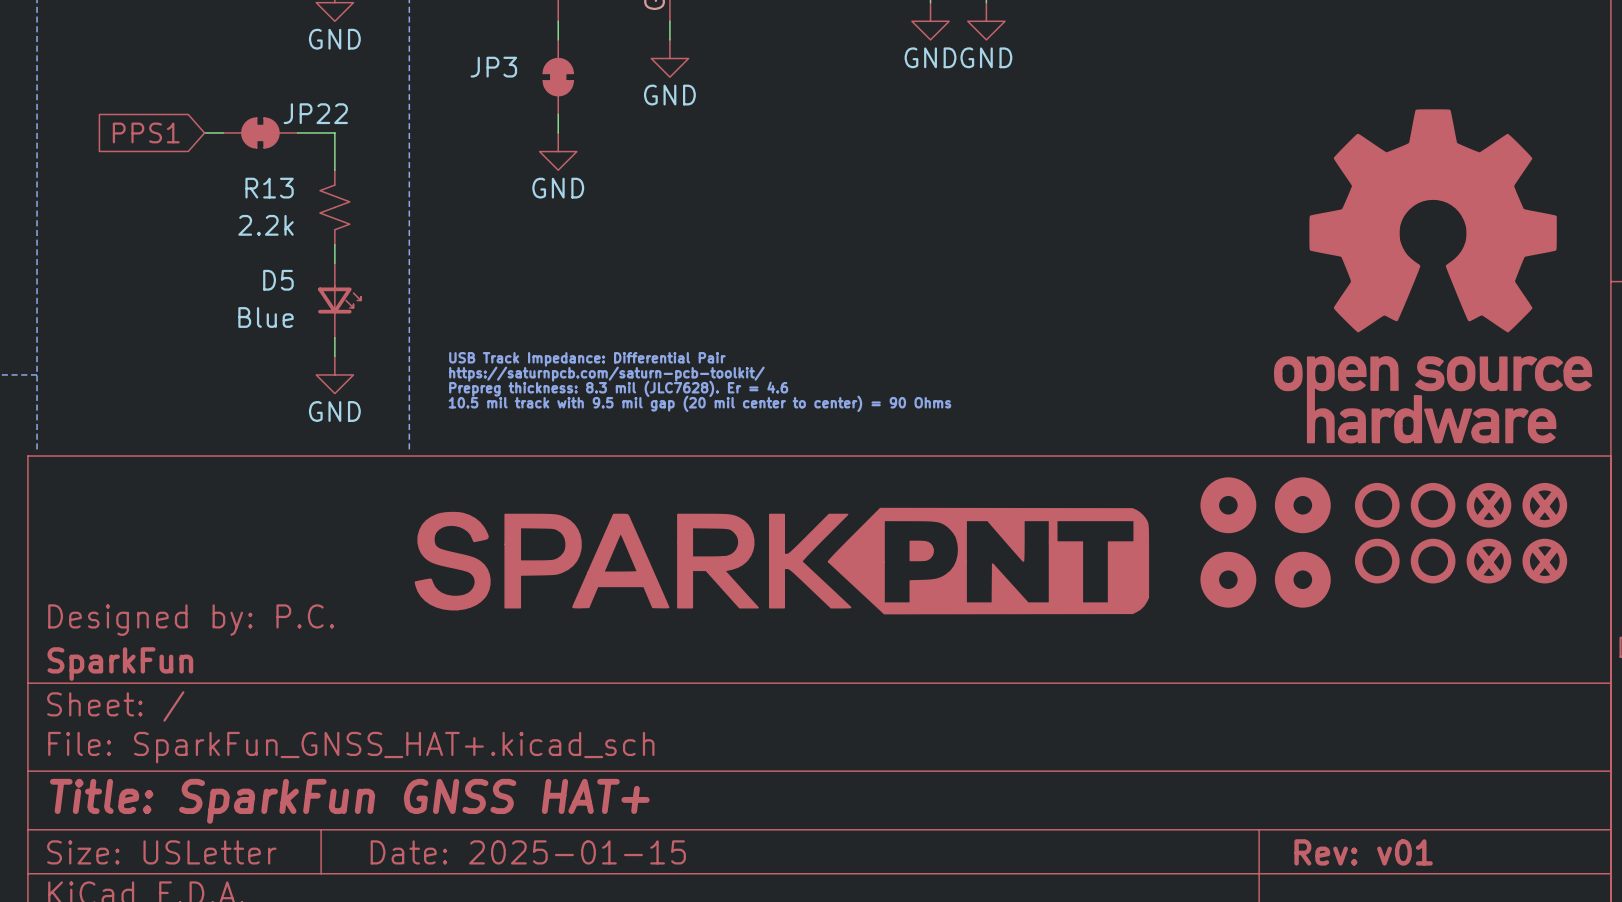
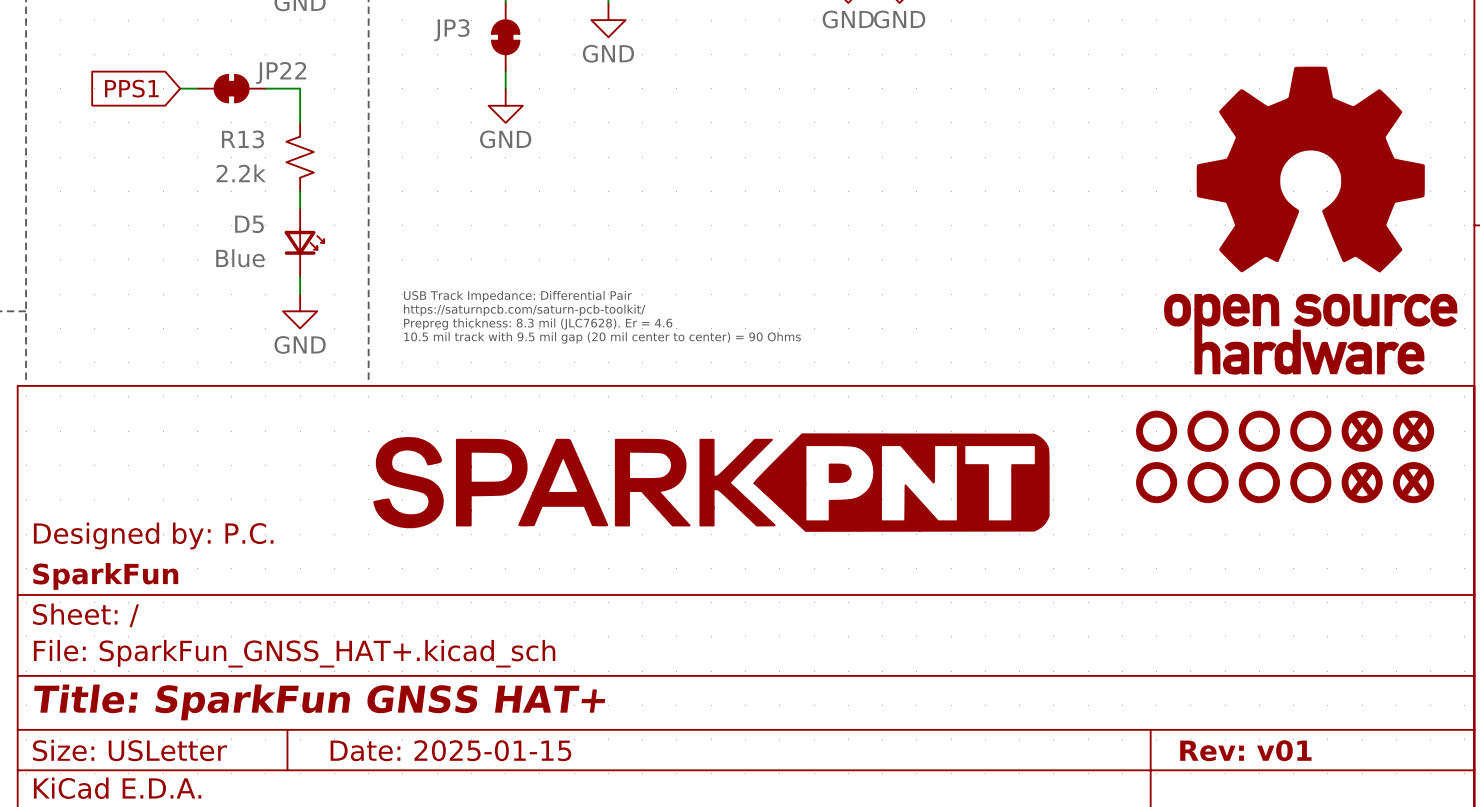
part: (1228, 505) -> none
part: none -> (1156, 431)
part: (1302, 505) -> none
part: none -> (1208, 431)
part: none -> (1156, 482)
part: none -> (1208, 482)
part: (1228, 579) -> none
part: (1302, 579) -> none

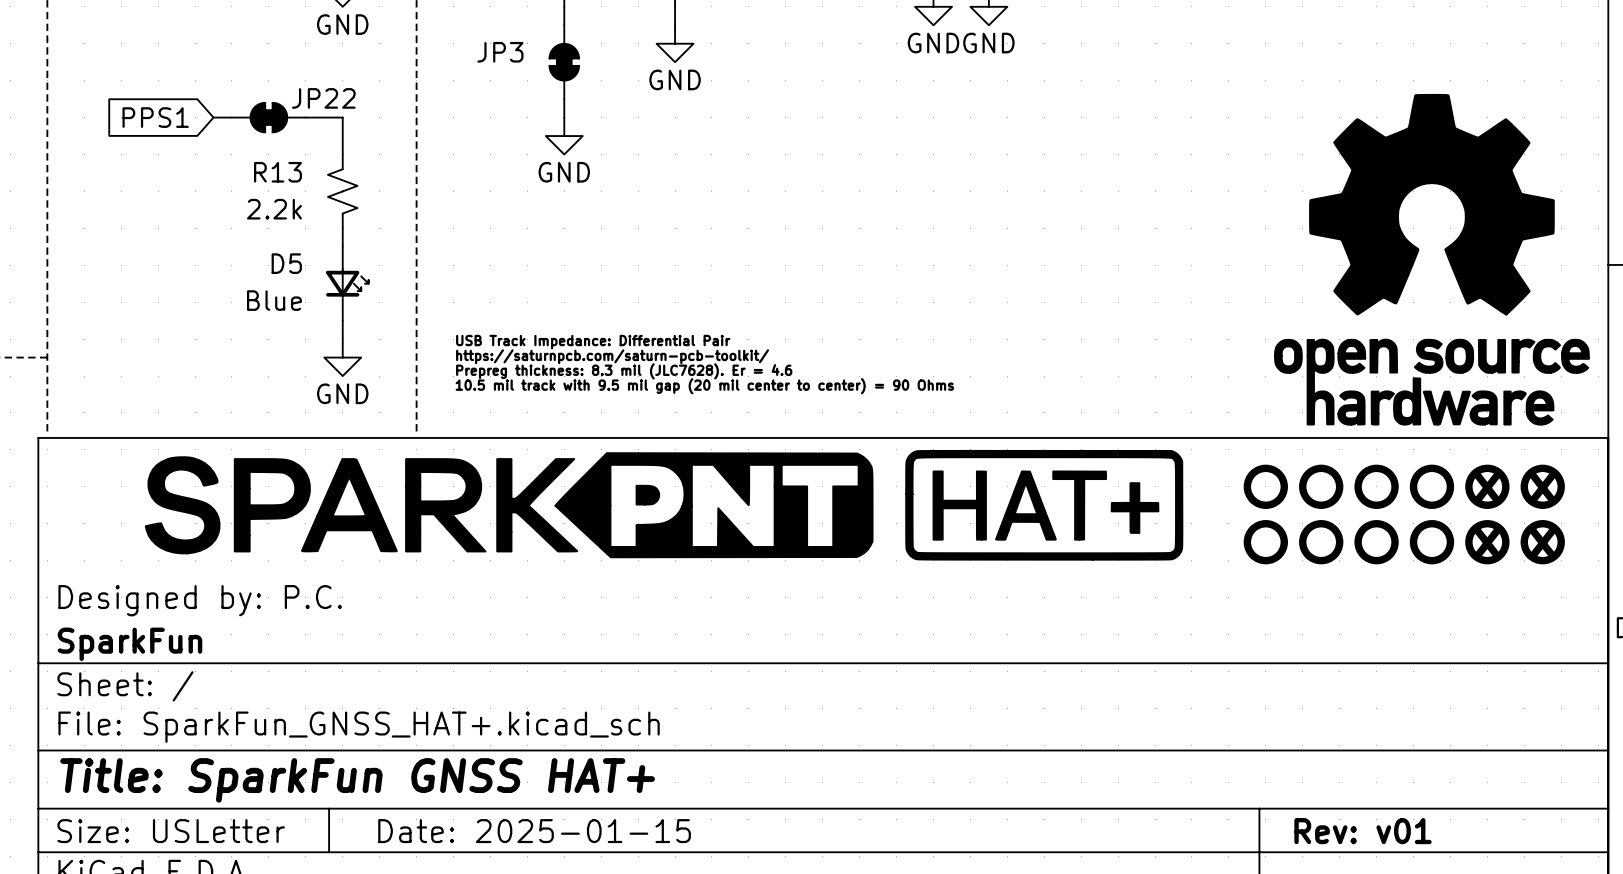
power symbol: none -> (1044, 505)
part position: (711, 482) -> (509, 505)

